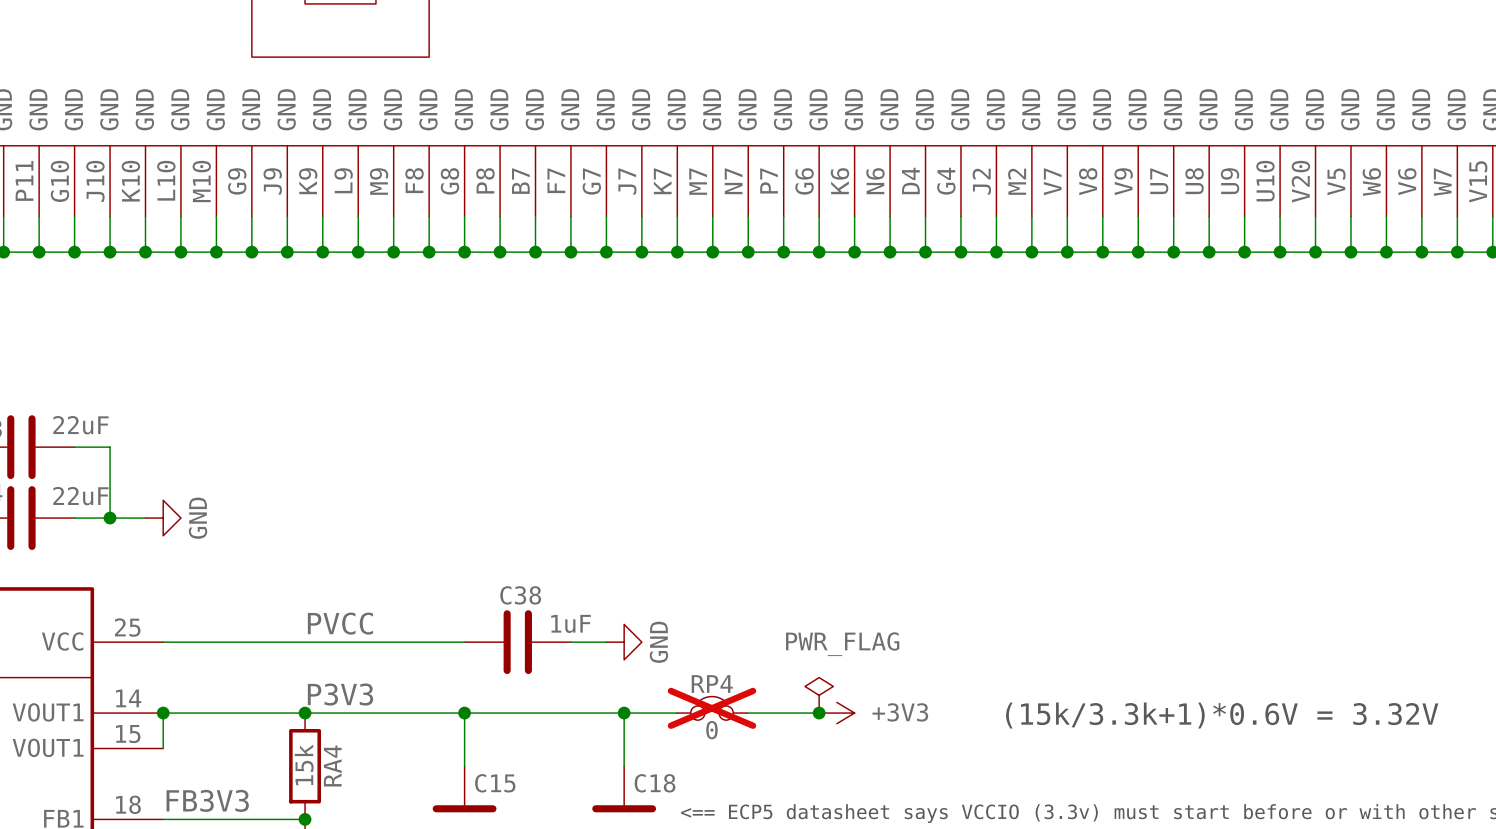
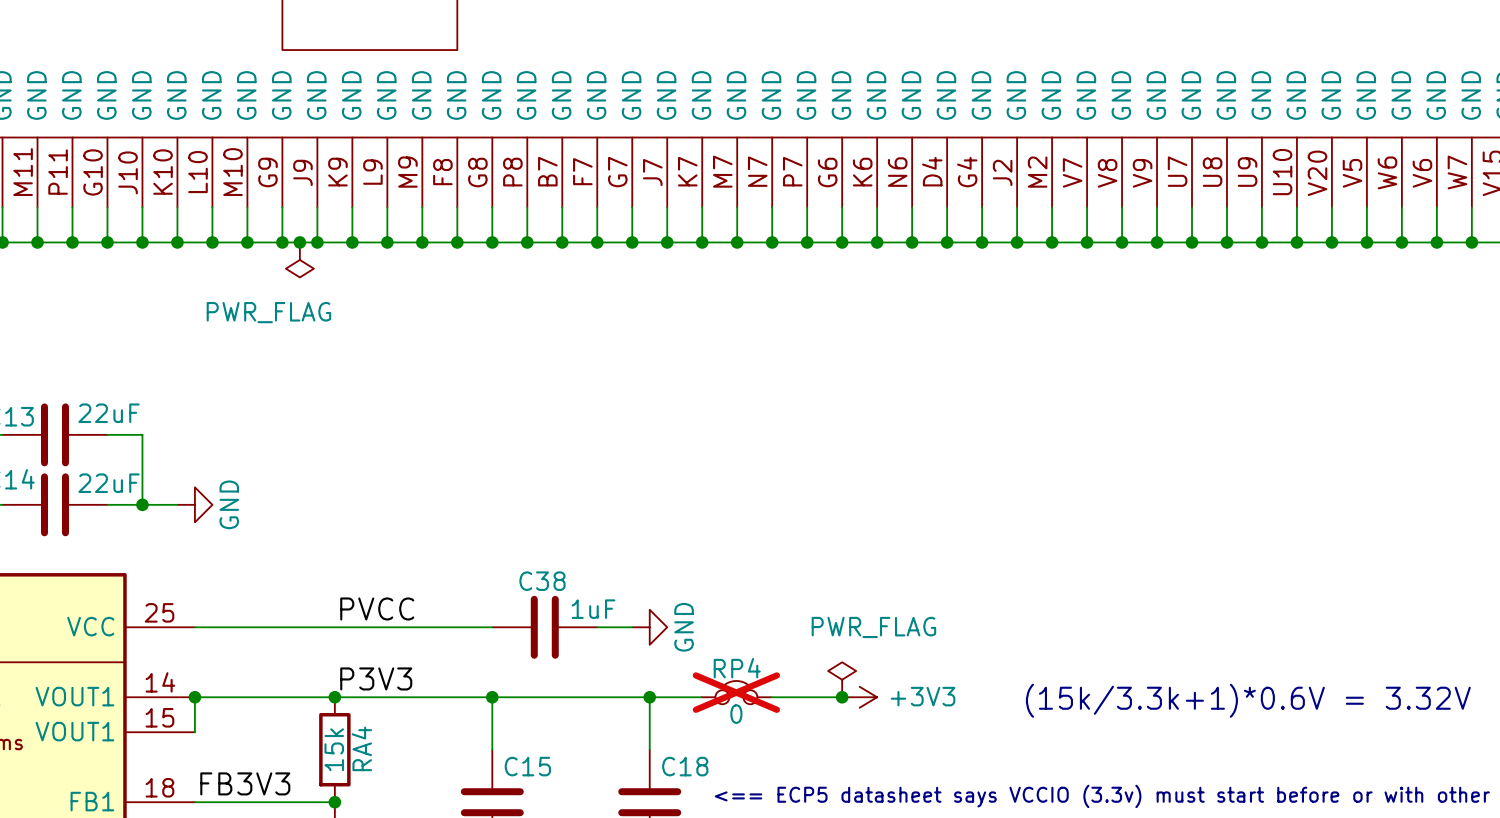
junction: none -> (299, 242)
power symbol: none -> PWR_FLAG (299, 259)

